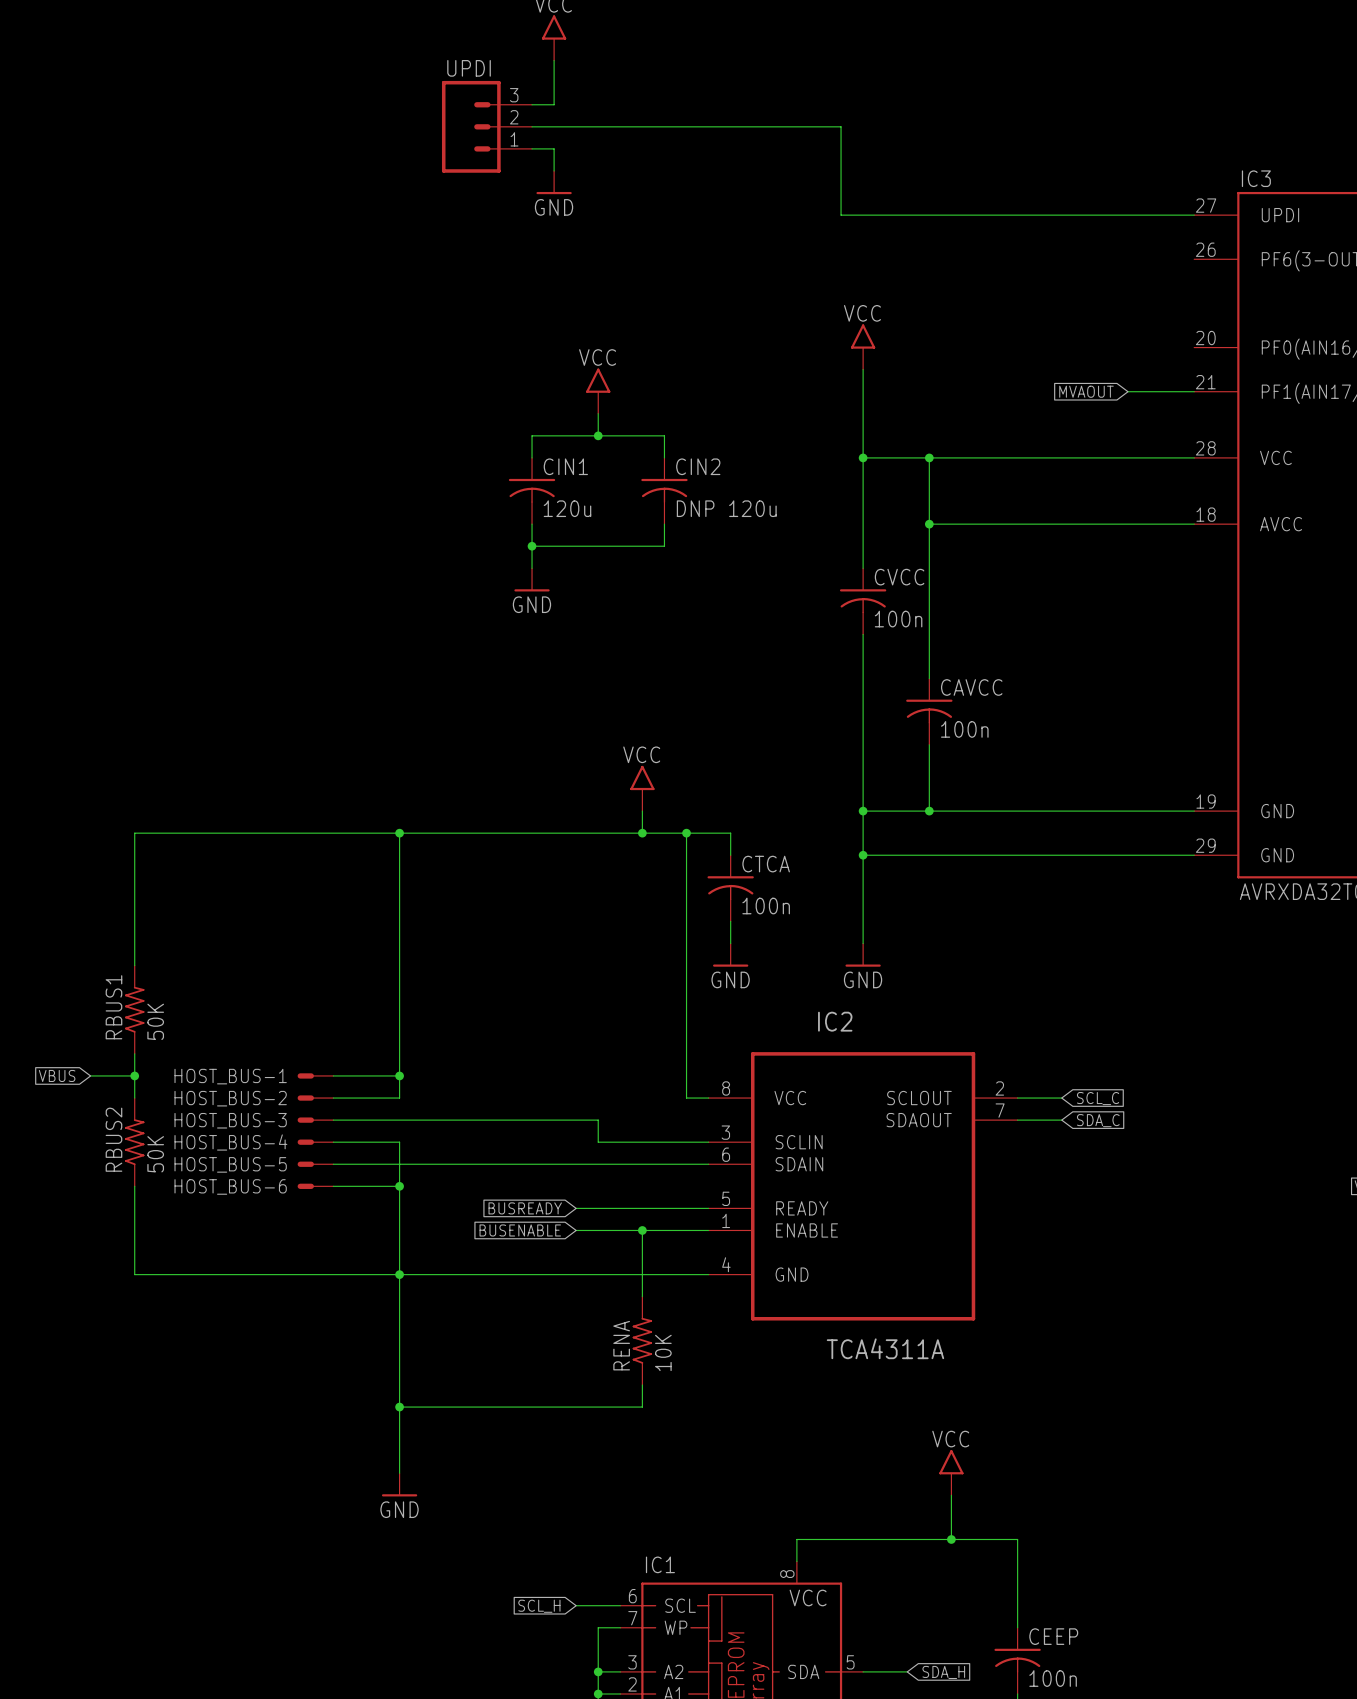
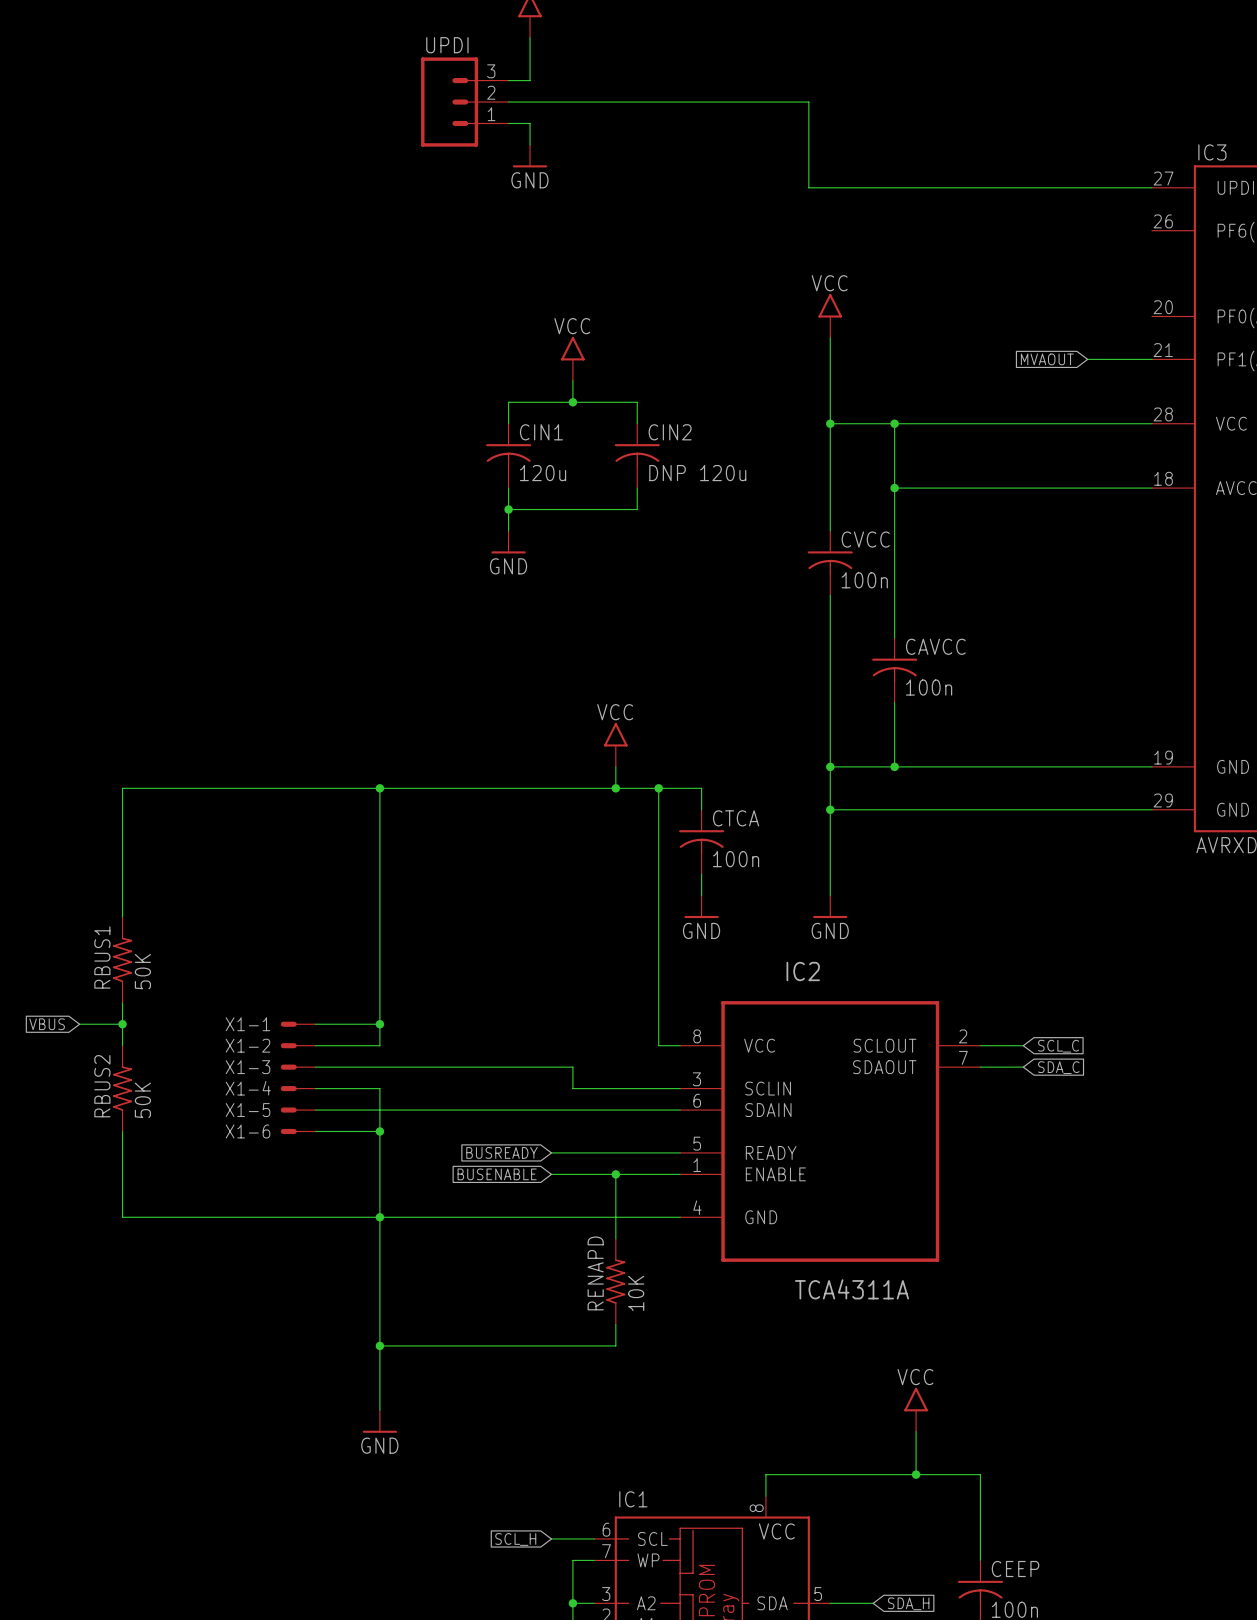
HOST_BUS-1 name: HOST_BUS-1 (230, 1076) -> X1-1 (248, 1024)
HOST_BUS-2 name: HOST_BUS-2 (230, 1098) -> X1-2 (248, 1045)
HOST_BUS-3 name: HOST_BUS-3 (230, 1120) -> X1-3 (248, 1067)
HOST_BUS-4 name: HOST_BUS-4 (230, 1142) -> X1-4 (248, 1088)
HOST_BUS-5 name: HOST_BUS-5 (230, 1164) -> X1-5 (248, 1110)
HOST_BUS-6 name: HOST_BUS-6 (230, 1186) -> X1-6 (248, 1131)
RENA name: RENA (621, 1345) -> RENAPD (595, 1273)

